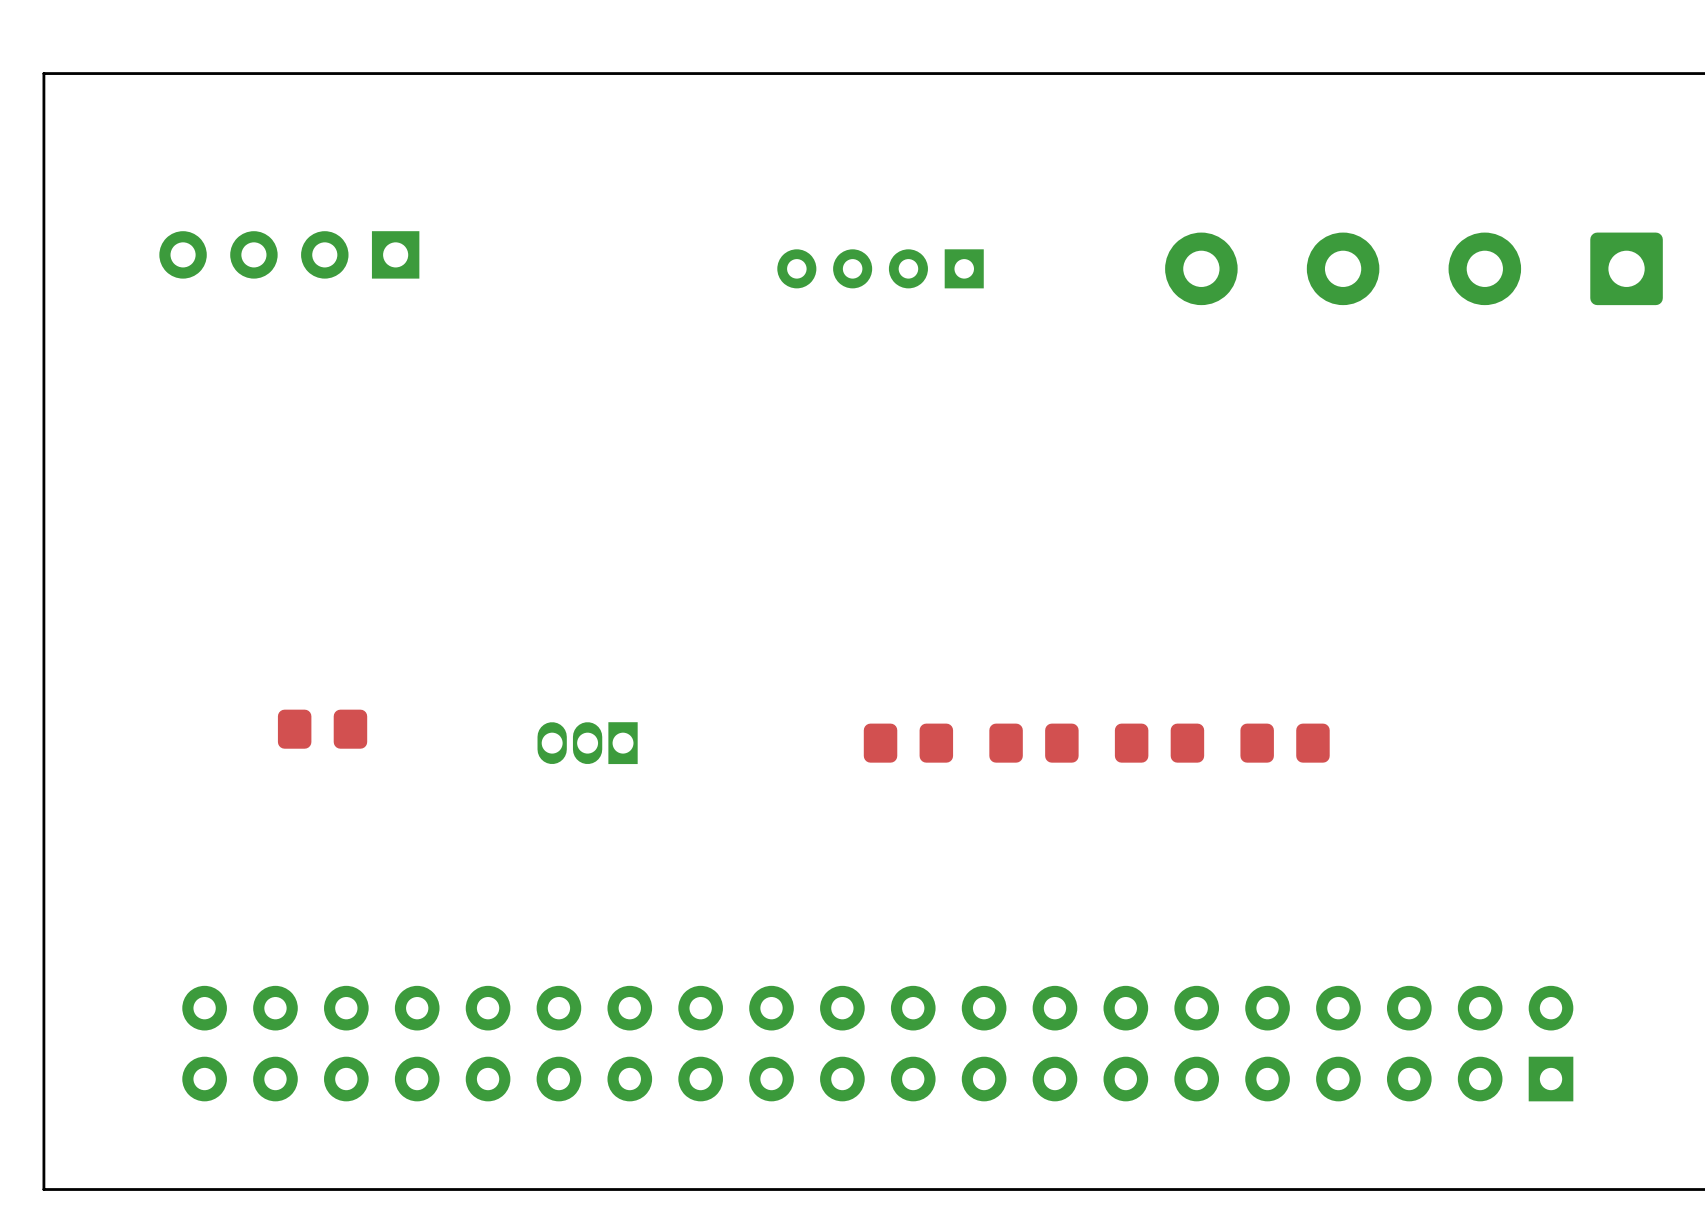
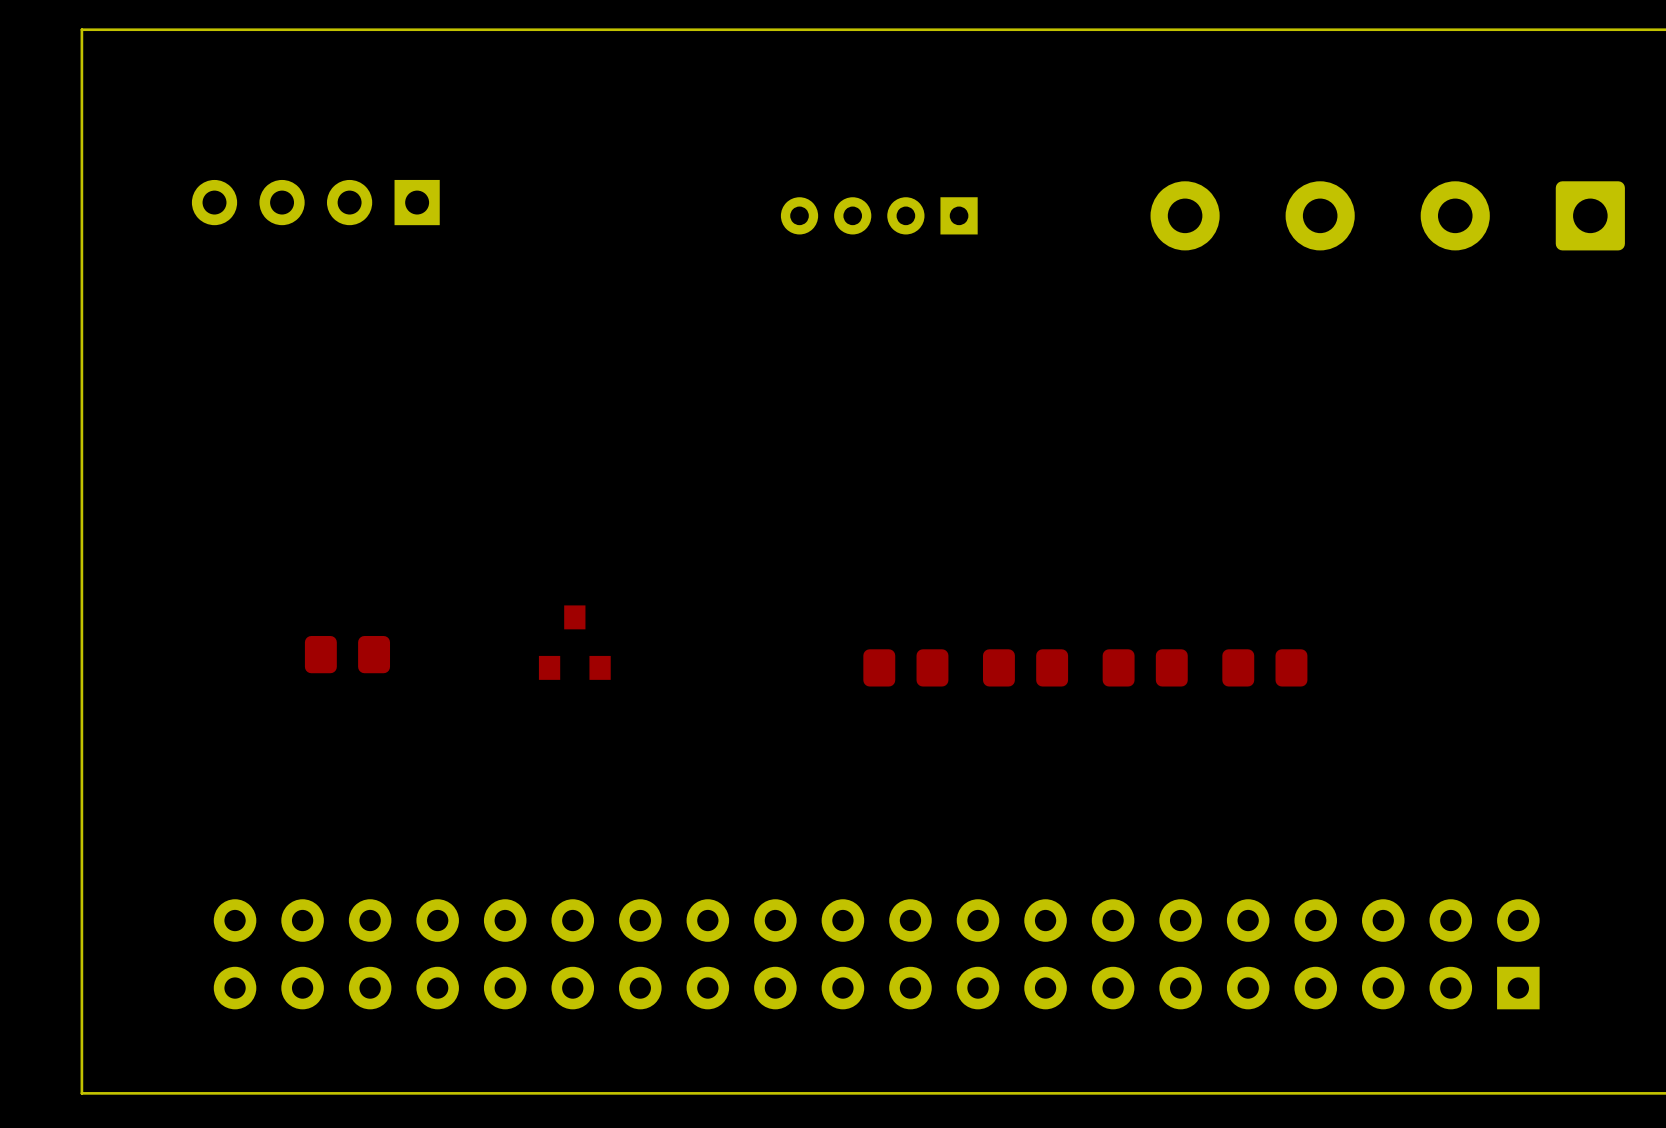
part: none -> (574, 642)
part: (587, 743) -> none

